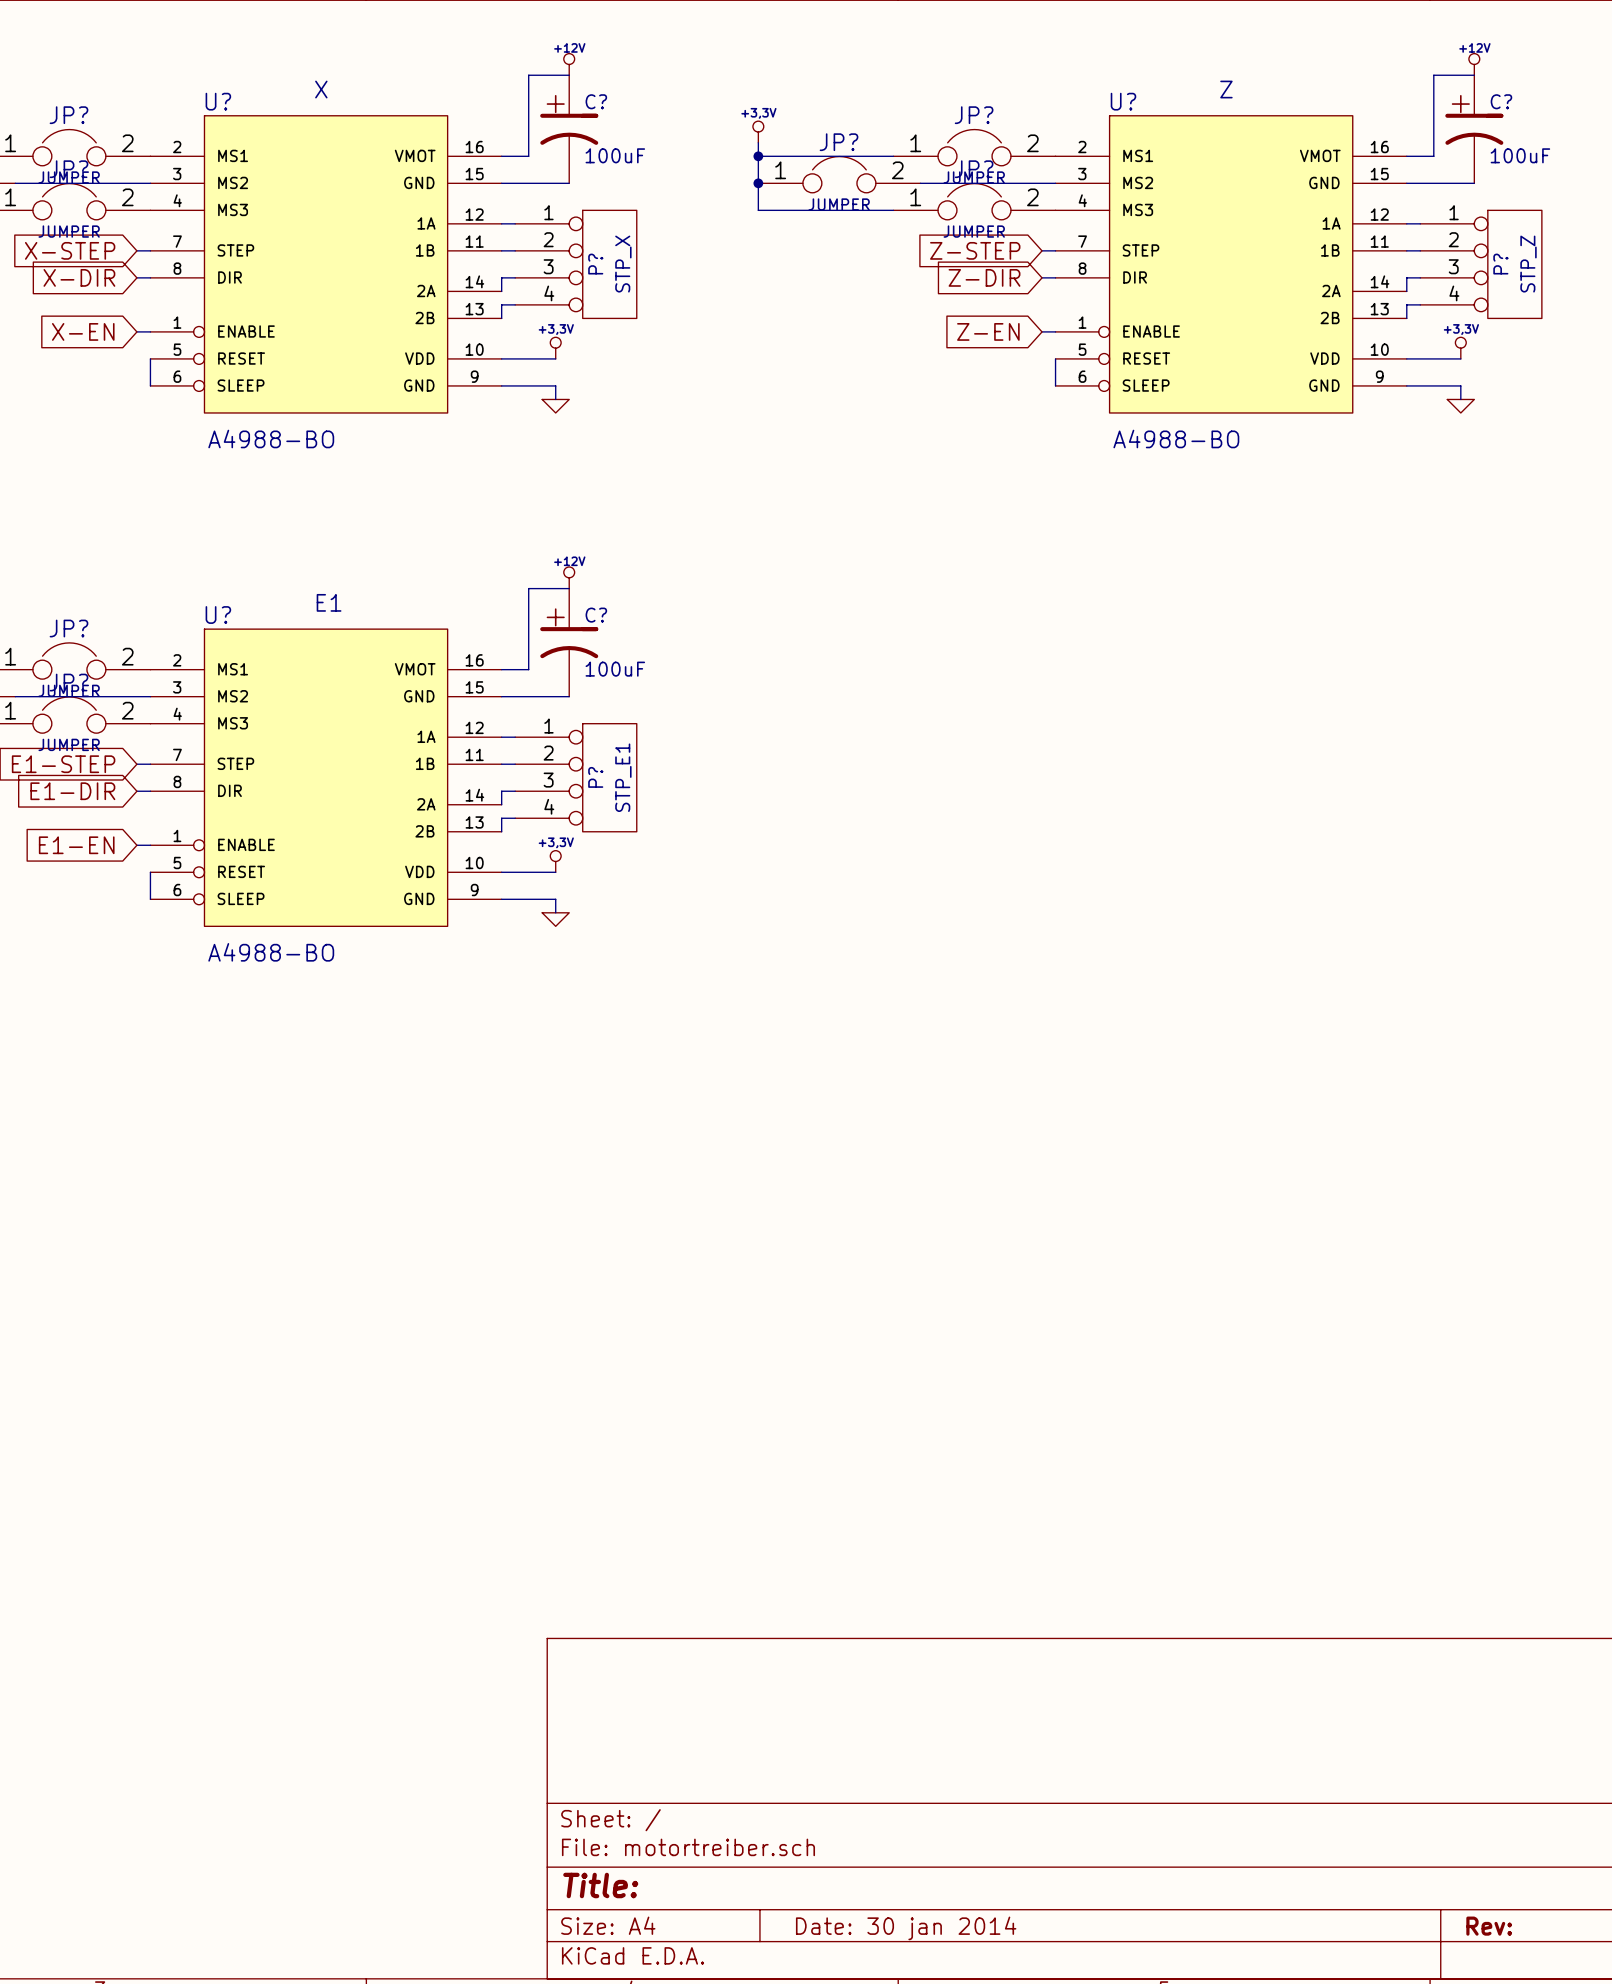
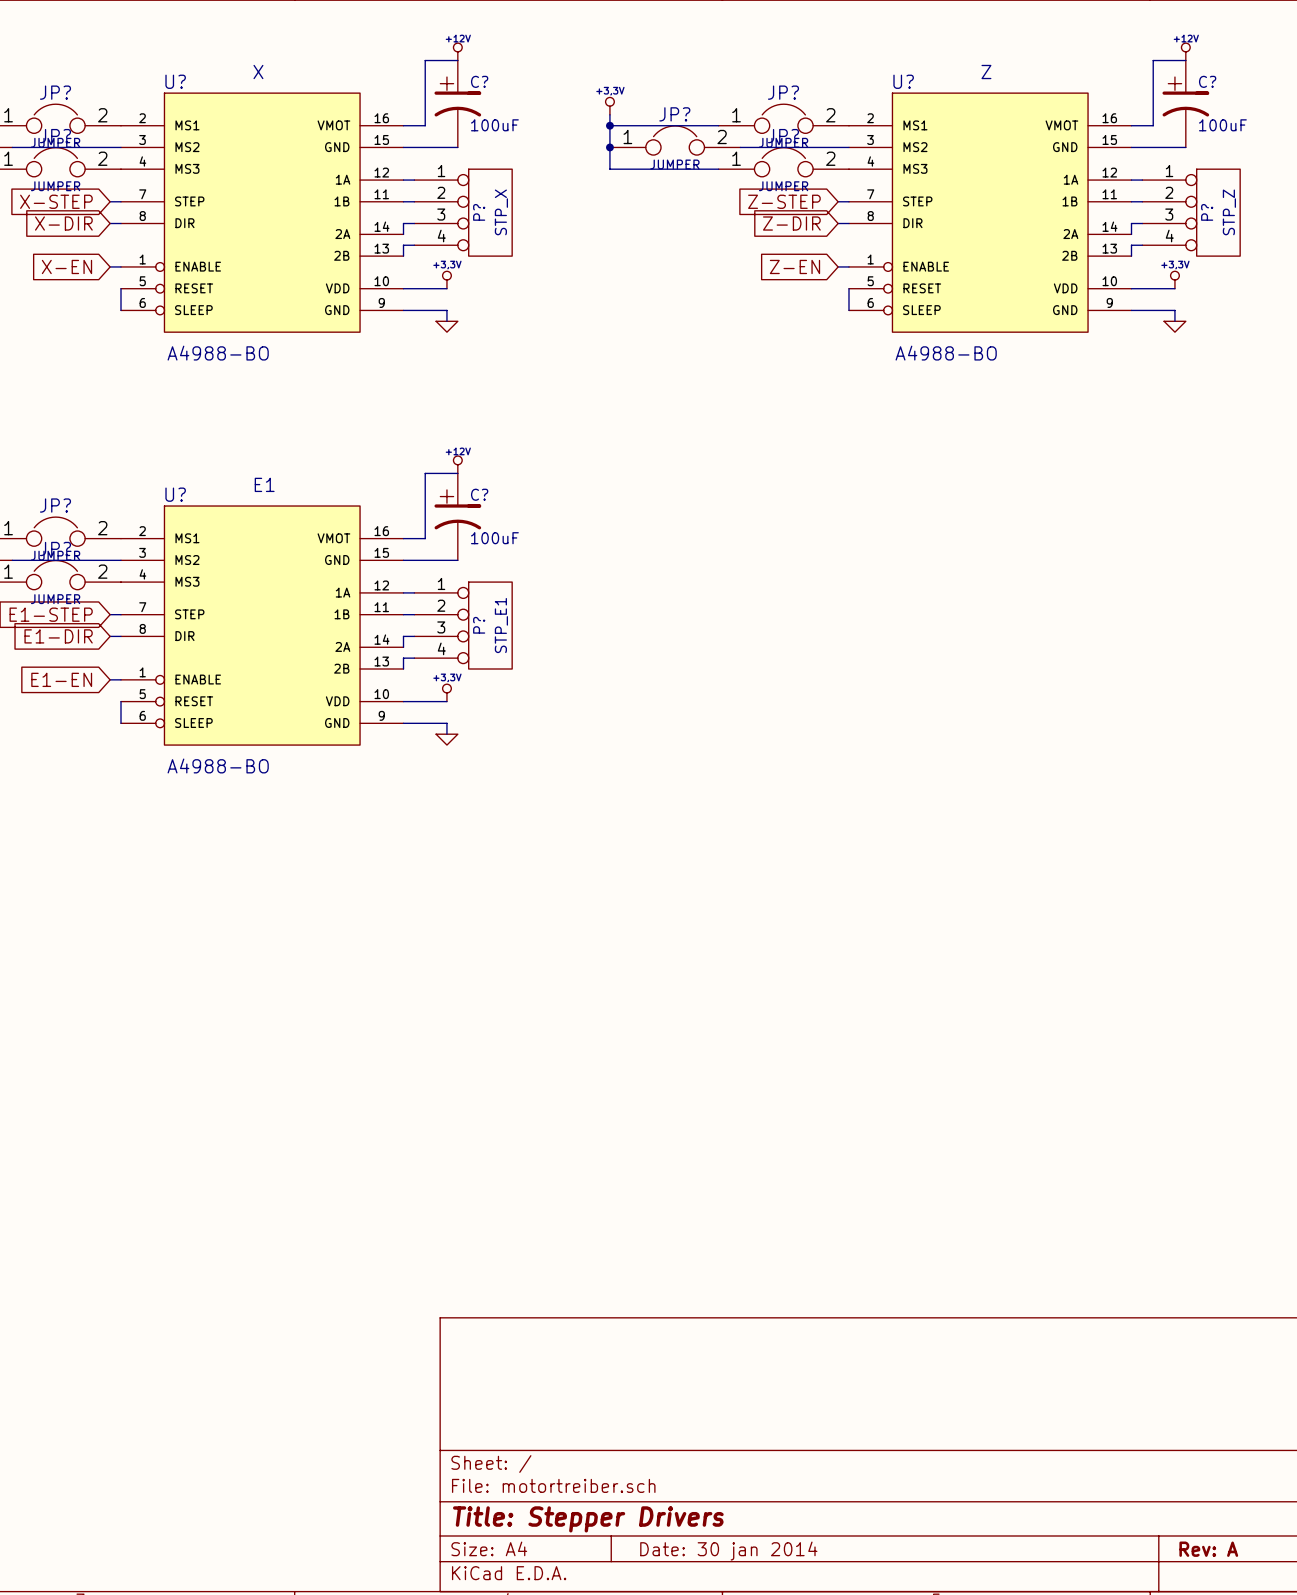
title block: Title: (600, 1885) -> Title: Stepper Drivers (588, 1519)
title block: Rev: (1489, 1926) -> Rev: A (1208, 1549)

